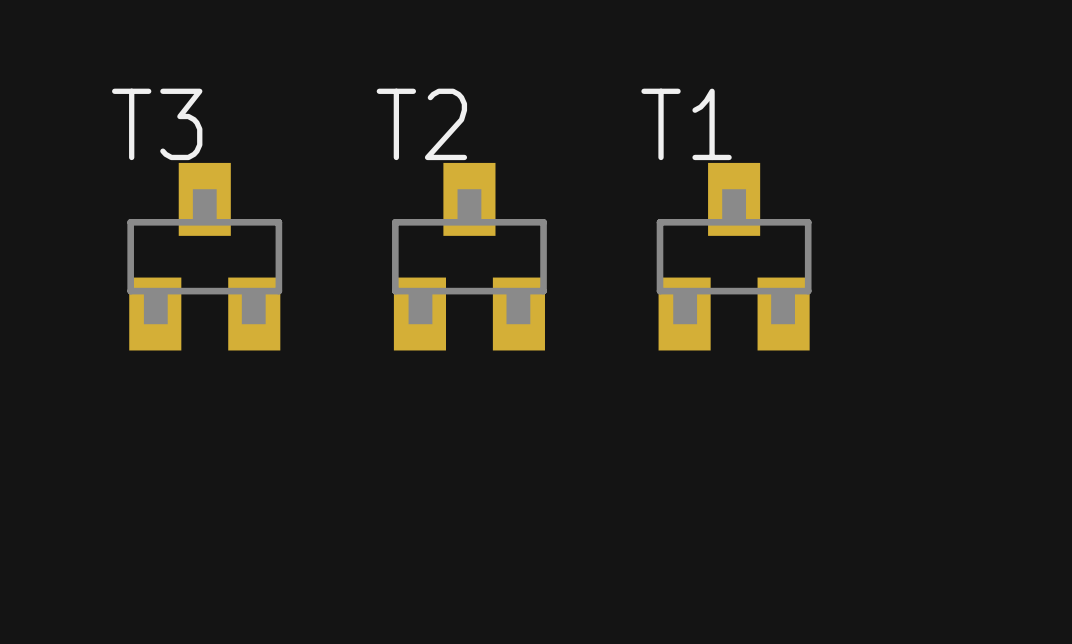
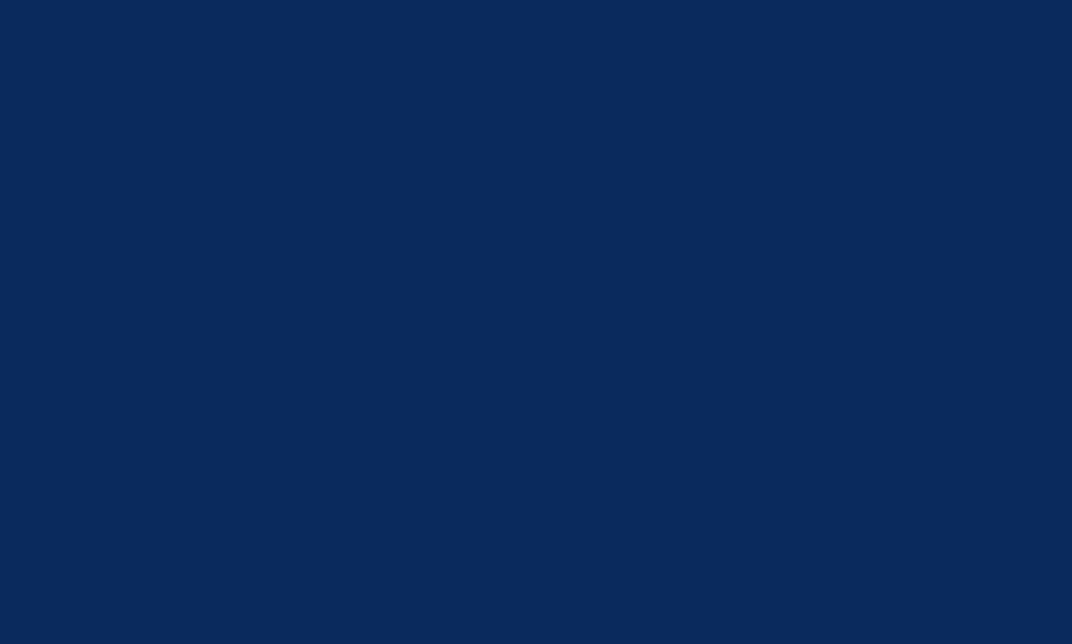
T3: (204, 256) -> none
T2: (469, 256) -> none
T1: (734, 256) -> none

